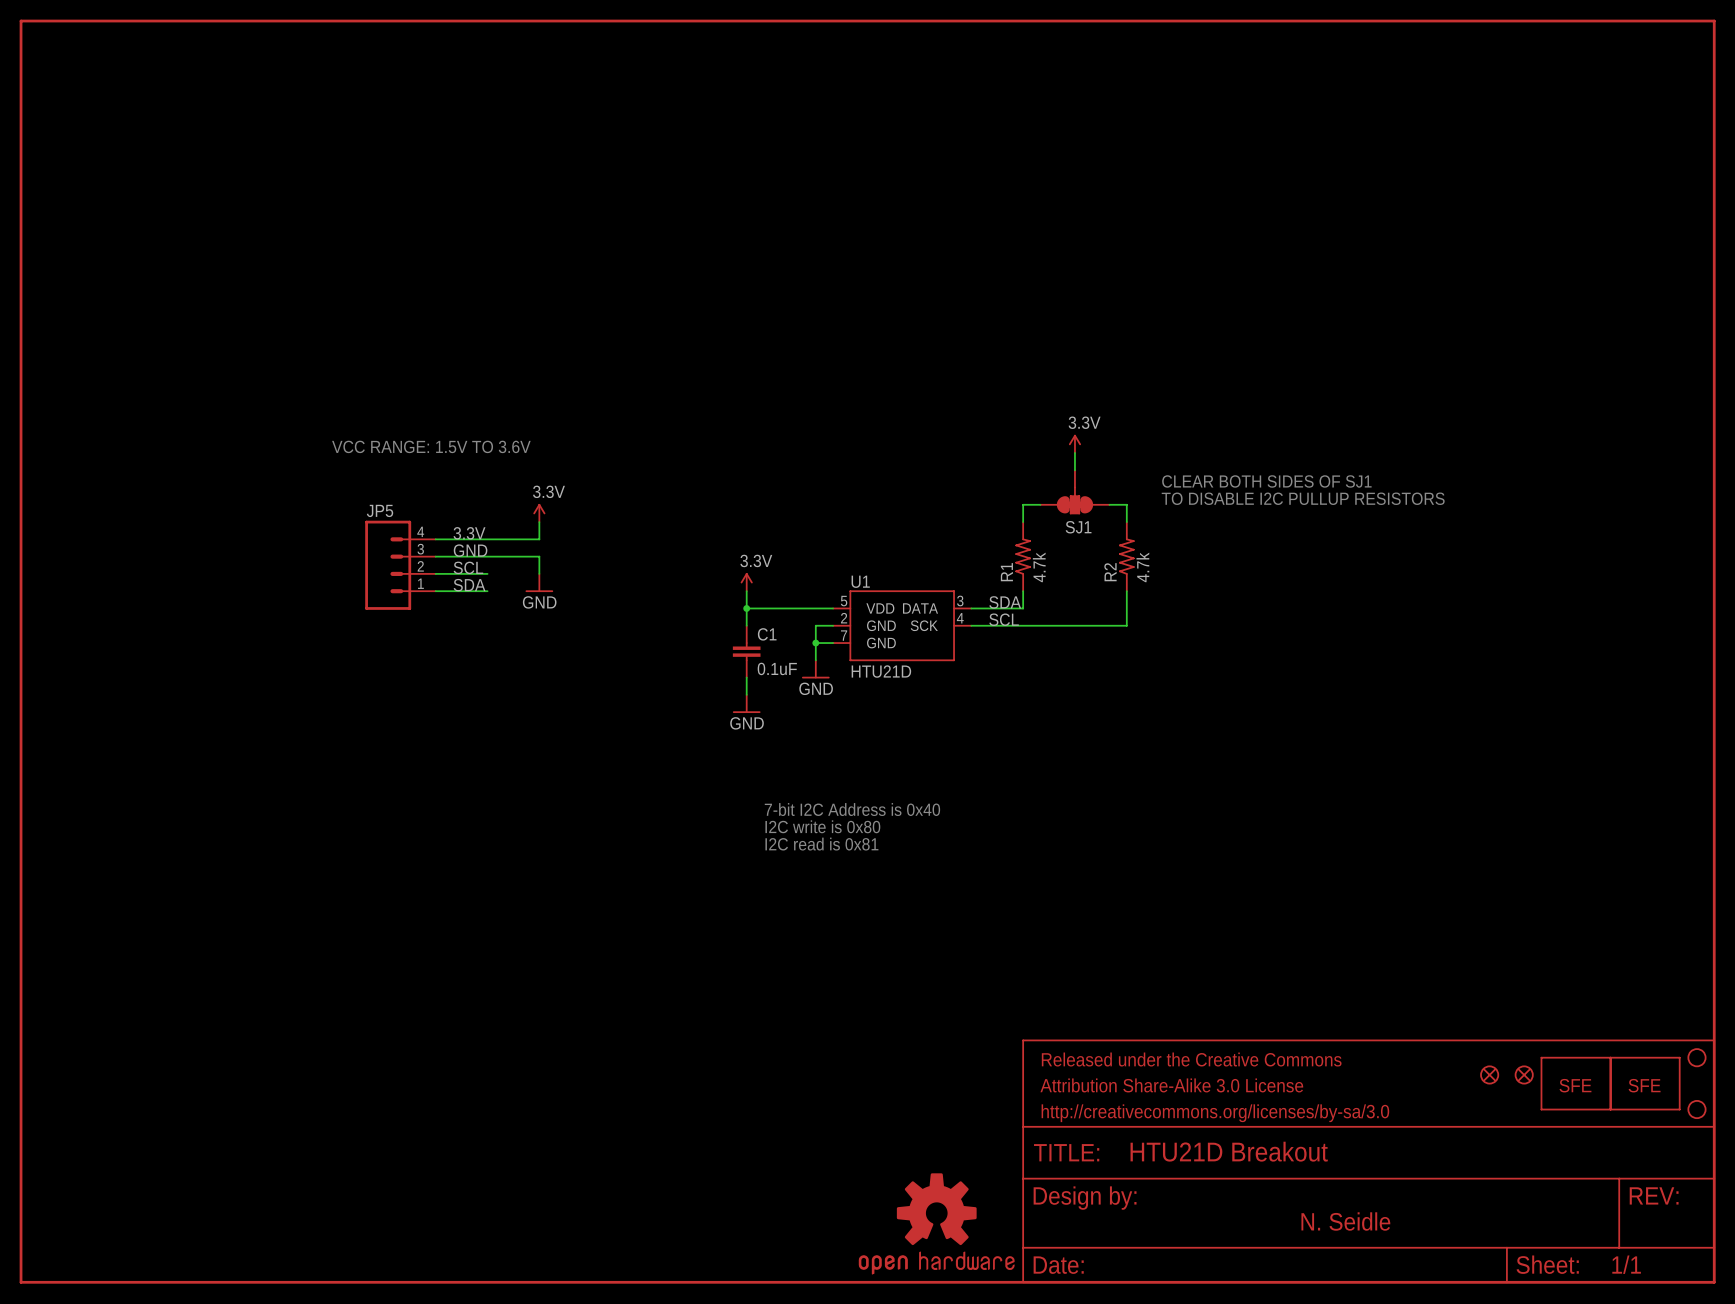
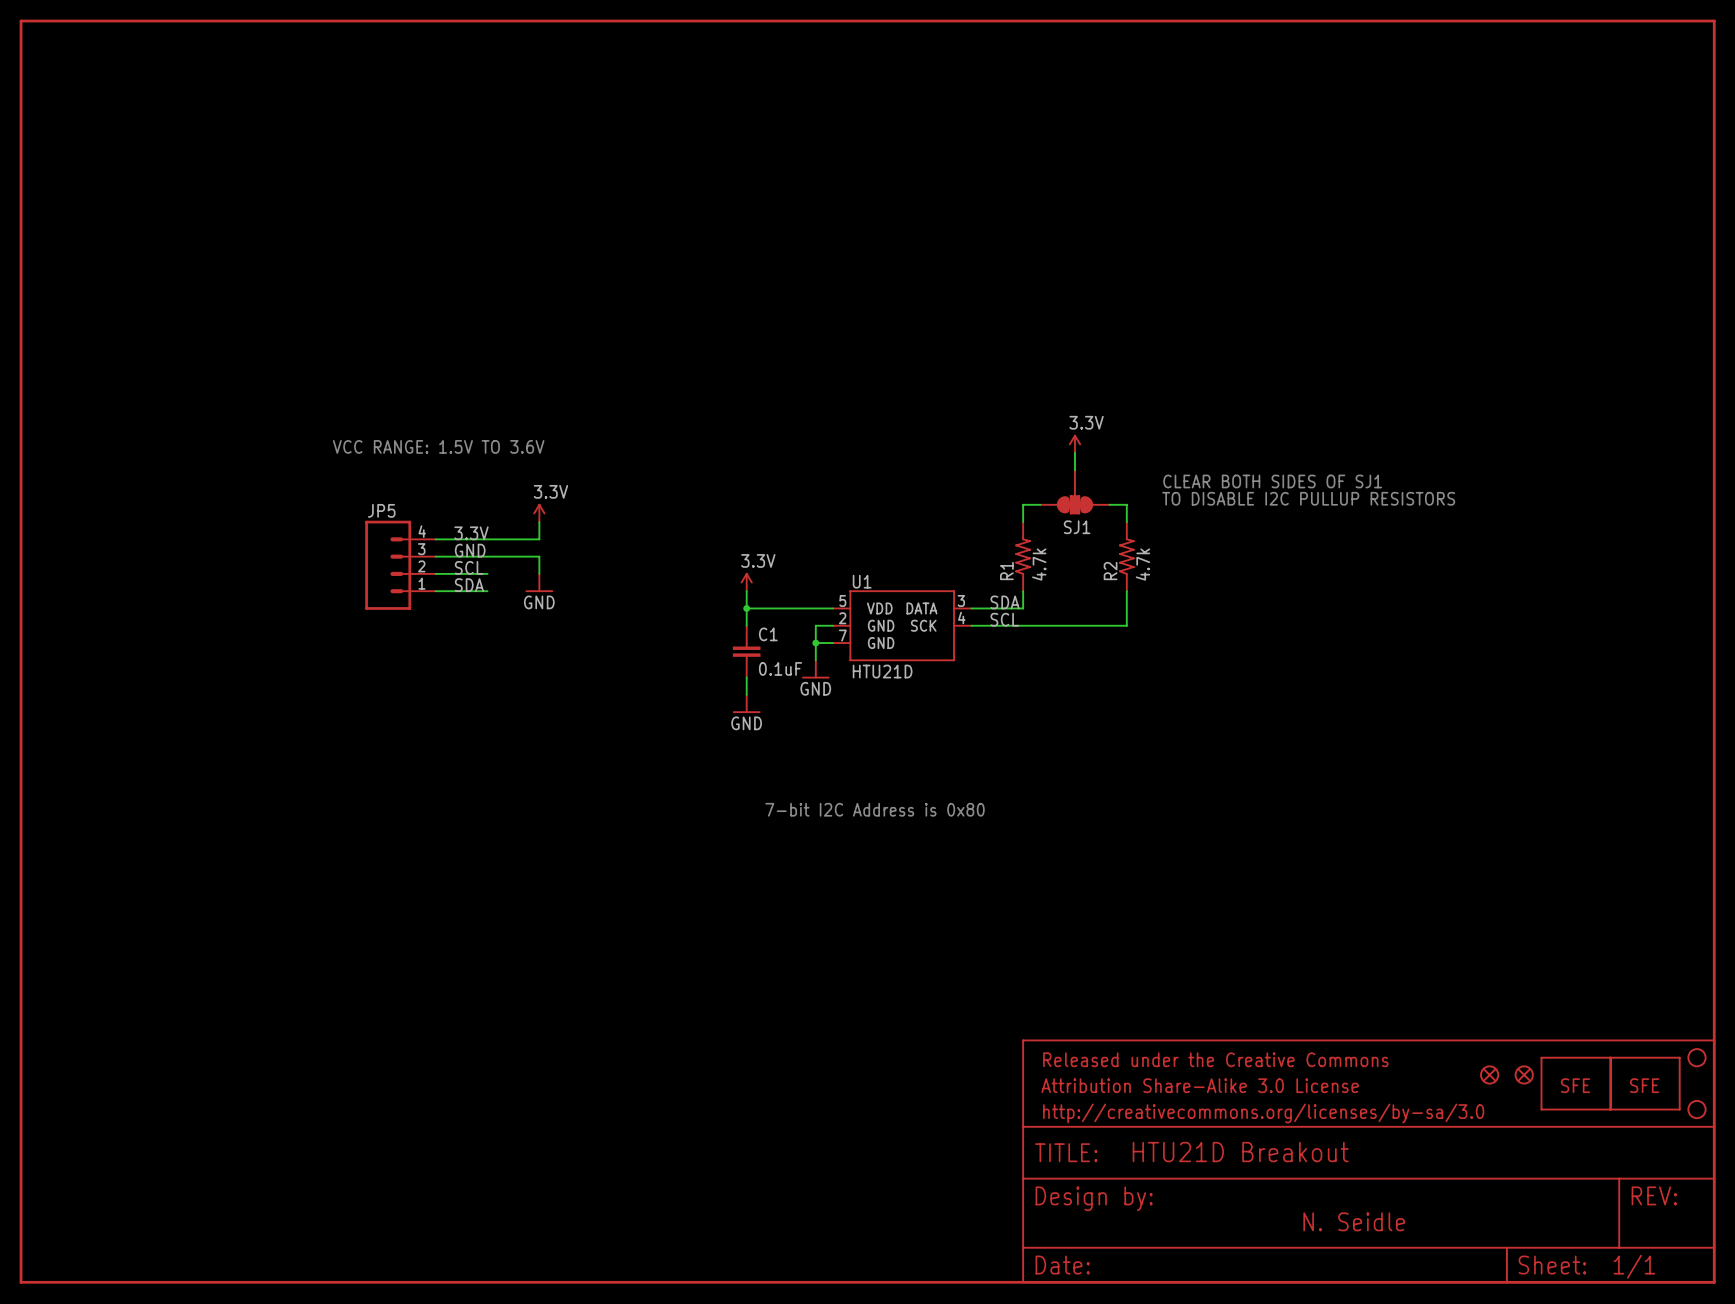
text: 7-bit I2C Address is 0x40 (852, 809) -> 7-bit I2C Address is 0x80 (875, 809)
text: I2C write is 0x80 (822, 826) -> none
text: I2C read is 0x81 (821, 844) -> none
part: (936, 1223) -> none

